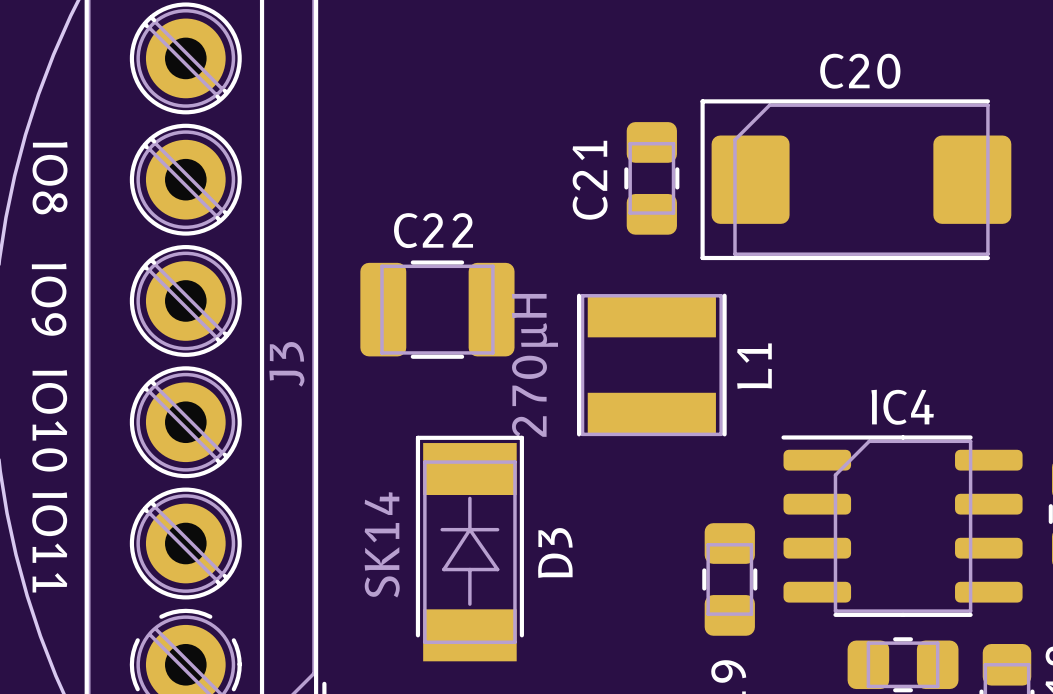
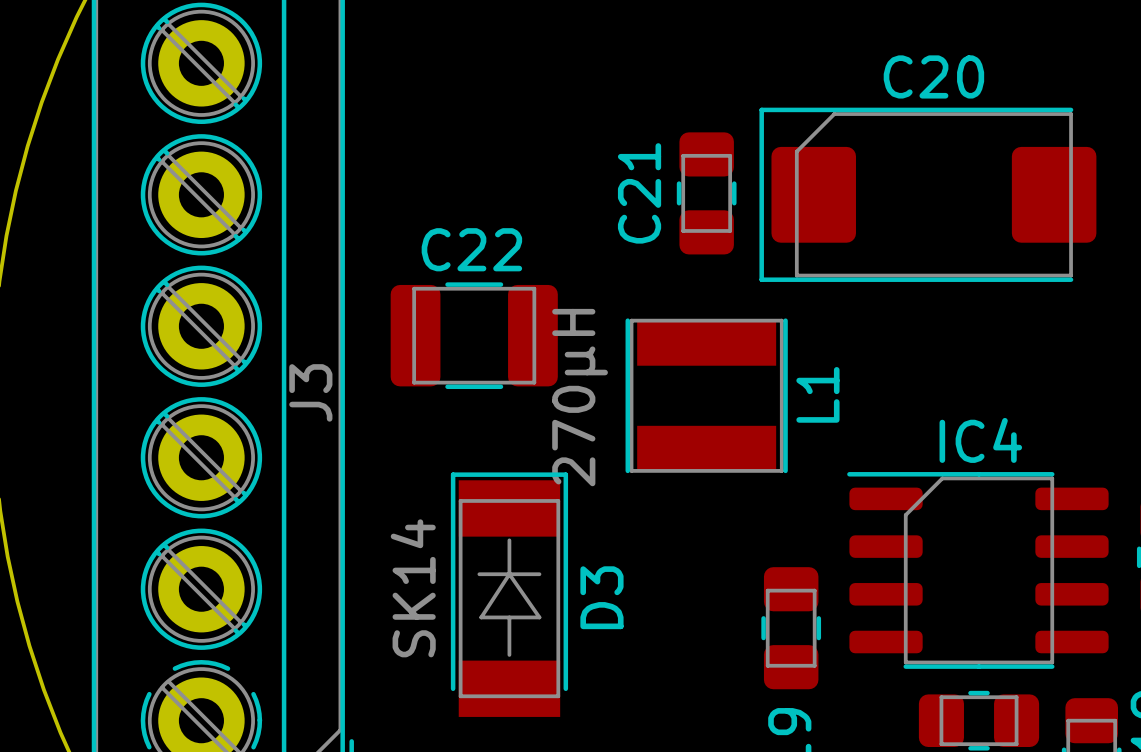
text: IO8 (50, 178) -> none
text: IO9 (49, 299) -> none
text: IO10 (49, 420) -> none
text: IO11 (49, 542) -> none

